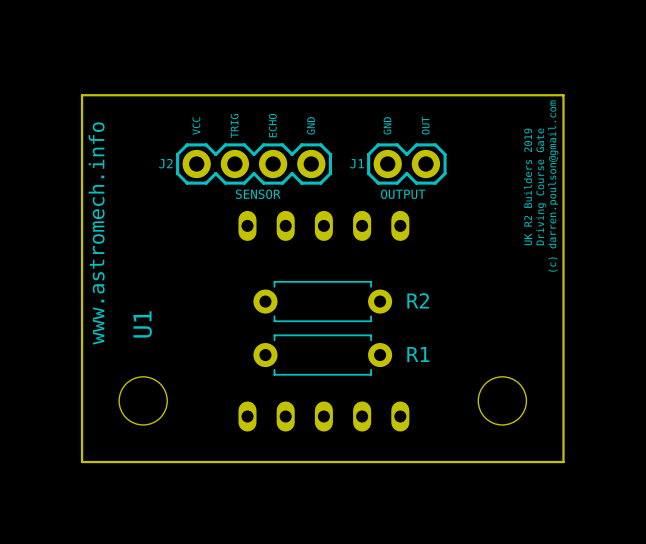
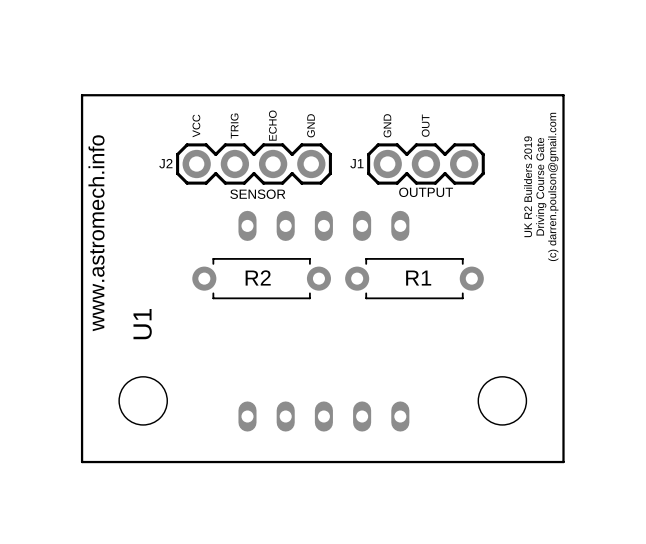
J1 footprint: [367, 143, 447, 185] -> [367, 143, 485, 185]
R2 name position: R2 (418, 300) -> R2 (258, 277)
R2 position: (322, 301) -> (261, 278)
R1 name position: R1 (418, 354) -> R1 (418, 278)
R1 position: (322, 355) -> (414, 278)

